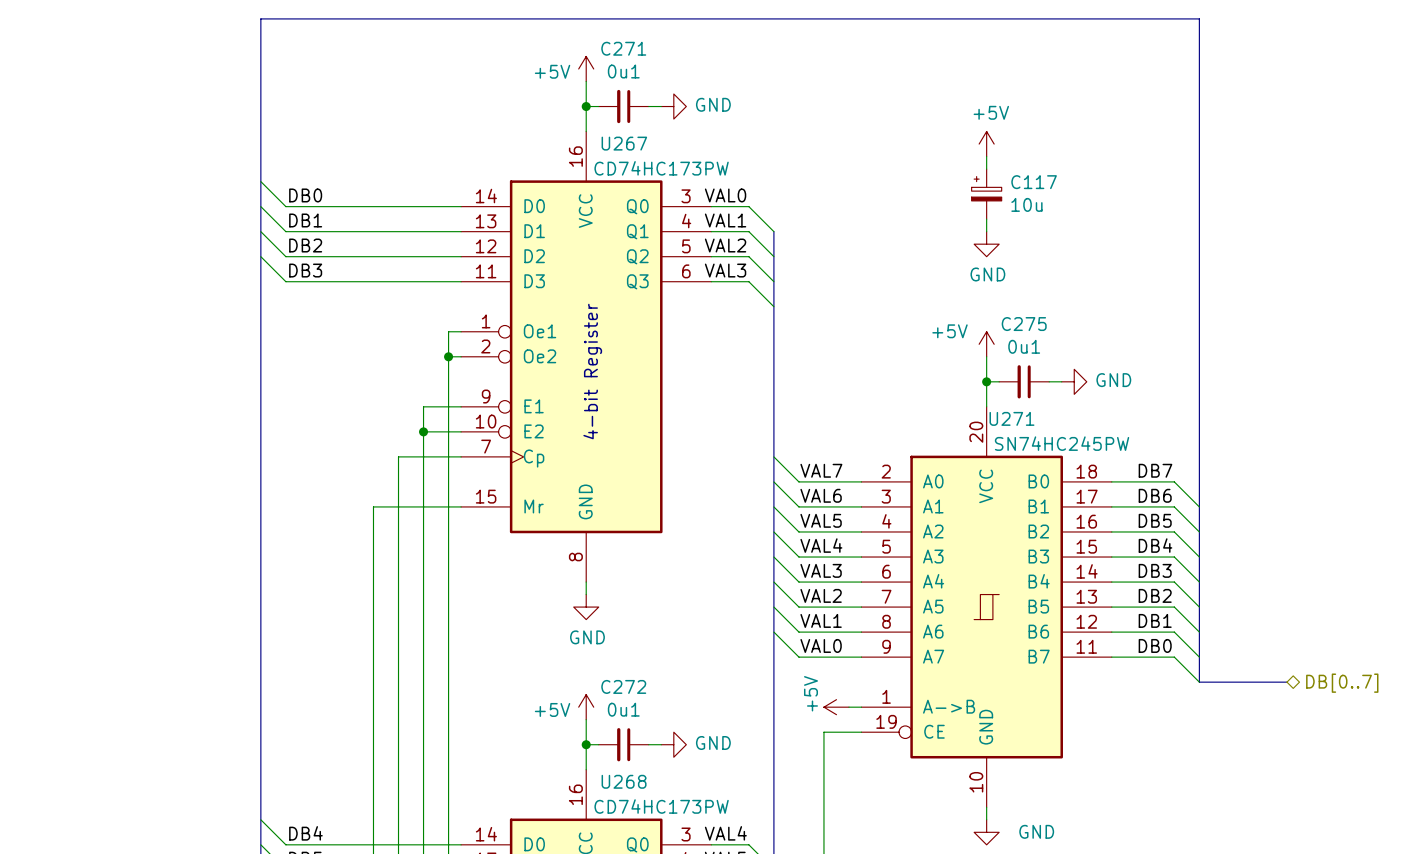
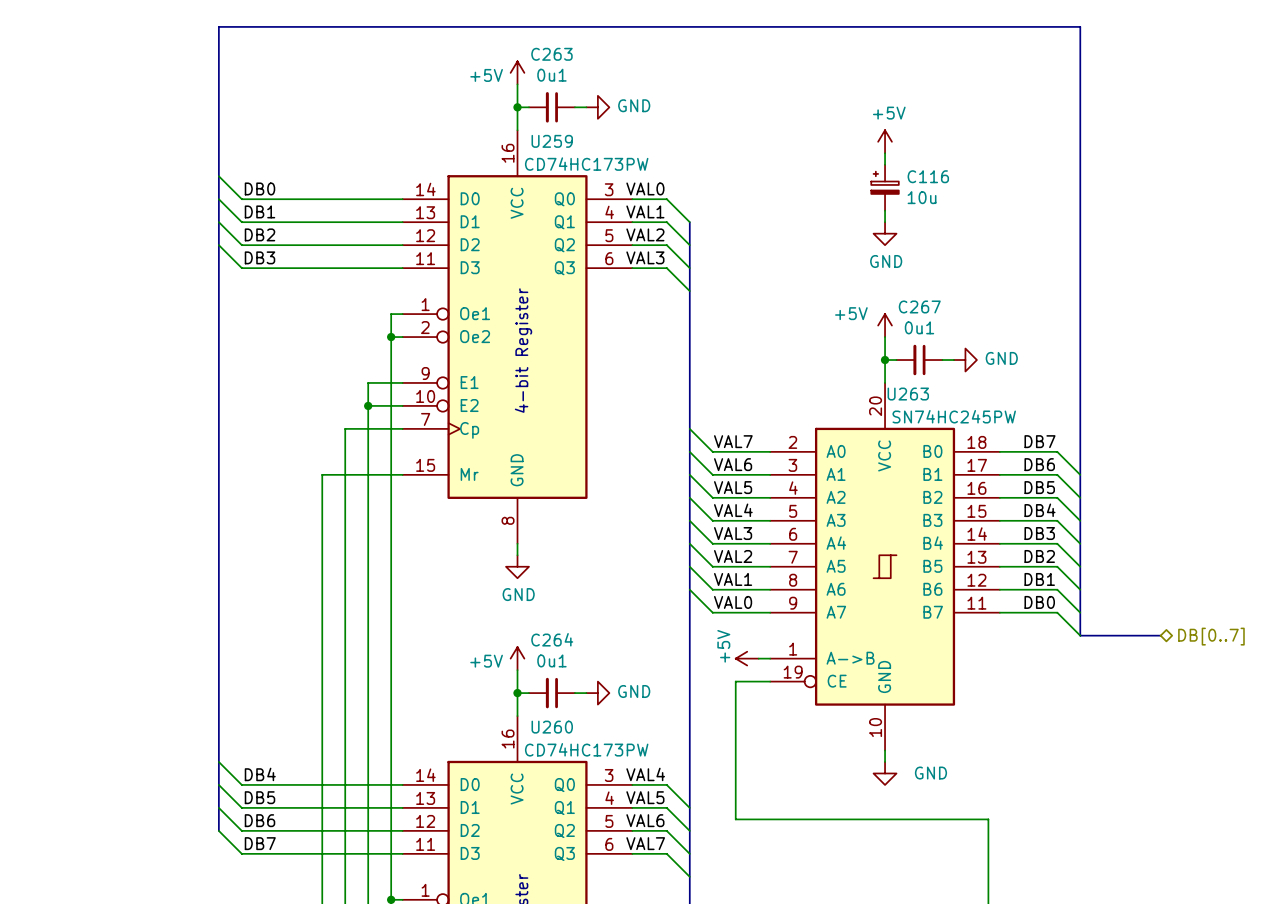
C271 name: C271 (623, 48) -> C263 (551, 54)
U267 name: U267 (624, 143) -> U259 (552, 141)
C117 name: C117 (1034, 182) -> C116 (928, 176)
C275 name: C275 (1024, 324) -> C267 (919, 306)
U271 name: U271 (1011, 418) -> U263 (908, 394)
C272 name: C272 (623, 686) -> C264 (552, 639)
U268 name: U268 (624, 781) -> U260 (552, 727)

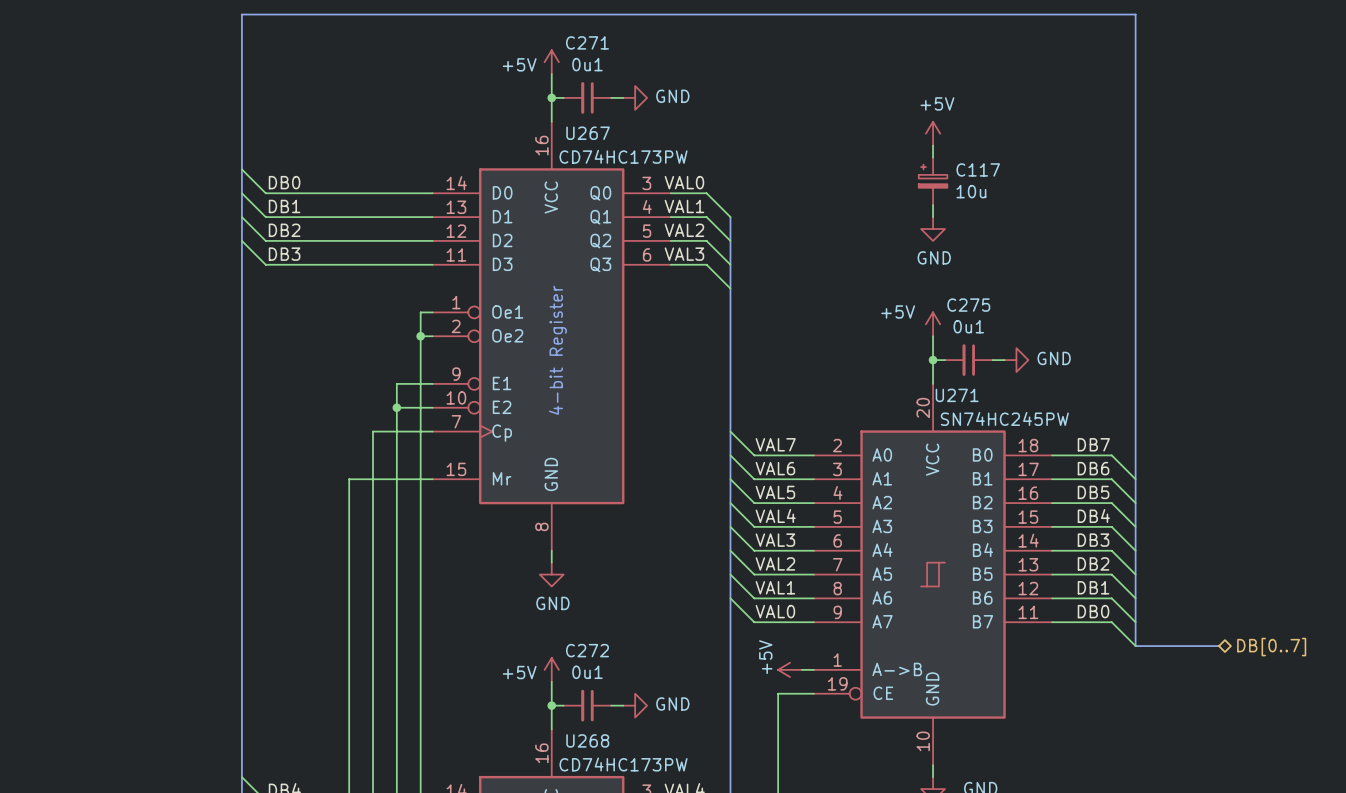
C263 name: C263 (551, 54) -> C271 (587, 42)
U259 name: U259 (552, 141) -> U267 (588, 133)
C116 name: C116 (928, 176) -> C117 (978, 169)
C267 name: C267 (919, 306) -> C275 (968, 305)
U263 name: U263 (908, 394) -> U271 (957, 395)
C264 name: C264 (552, 639) -> C272 (587, 650)
U260 name: U260 (552, 727) -> U268 (587, 740)

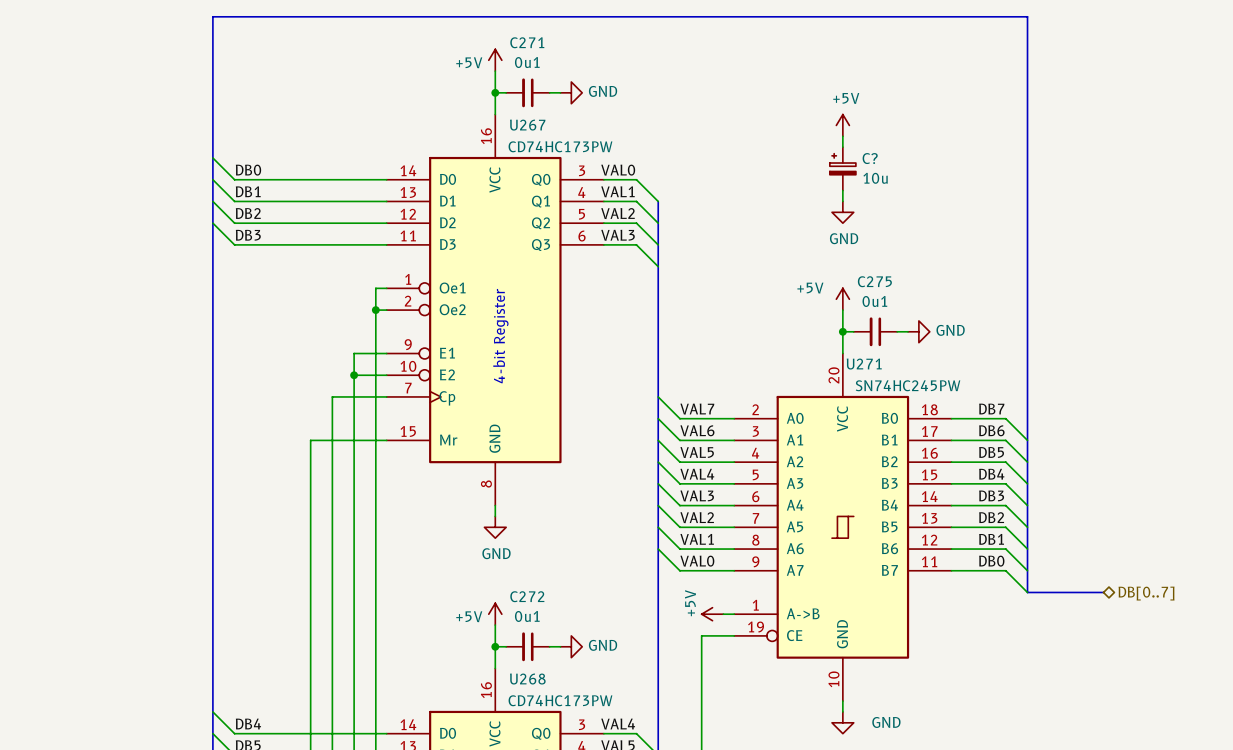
C117 name: C117 (978, 169) -> C? (870, 158)

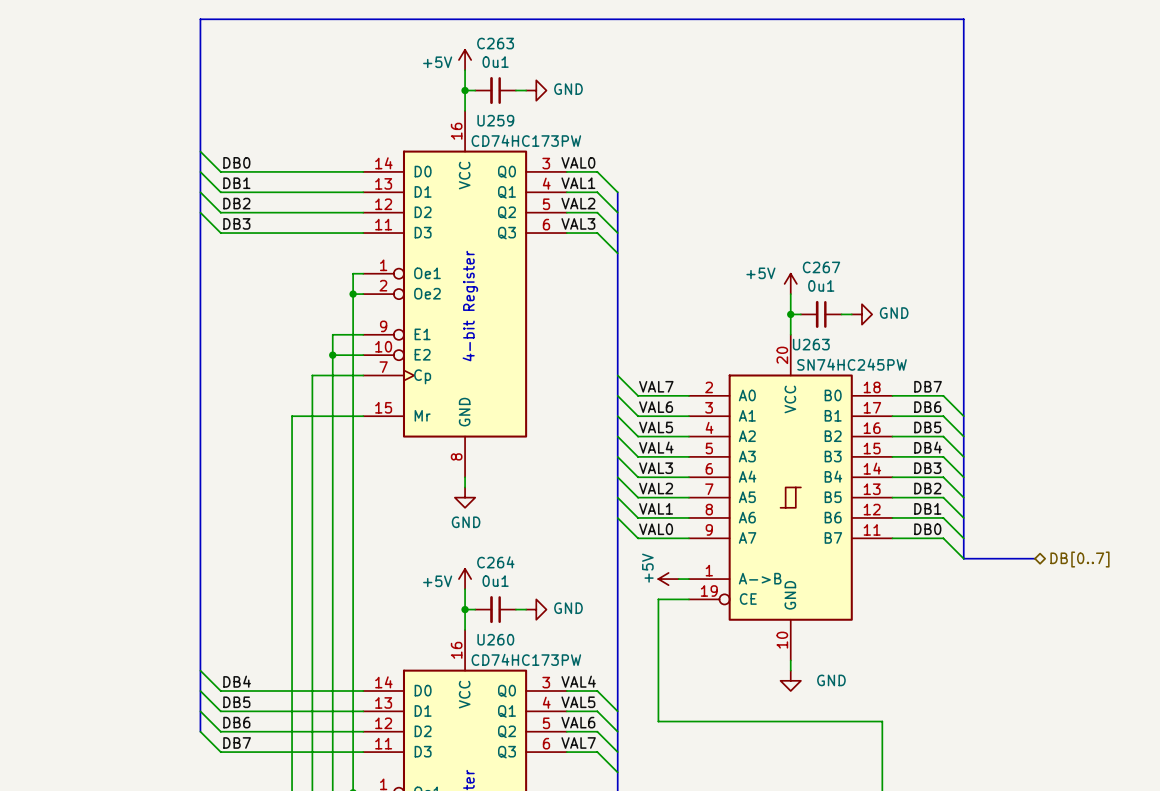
C271 name: C271 (527, 42) -> C263 (495, 43)
U267 name: U267 (527, 125) -> U259 (495, 120)
power symbol: +5V (842, 125) -> none
wire: (842, 136) (842, 147) -> none
C?: 10u (842, 168) -> none
wire: (842, 190) (842, 201) -> none
power symbol: GND (842, 212) -> none
C275 name: C275 (874, 281) -> C267 (821, 267)
U271 name: U271 (864, 364) -> U263 (811, 344)
C272 name: C272 (527, 596) -> C264 (495, 562)
U268 name: U268 (527, 679) -> U260 (495, 639)

